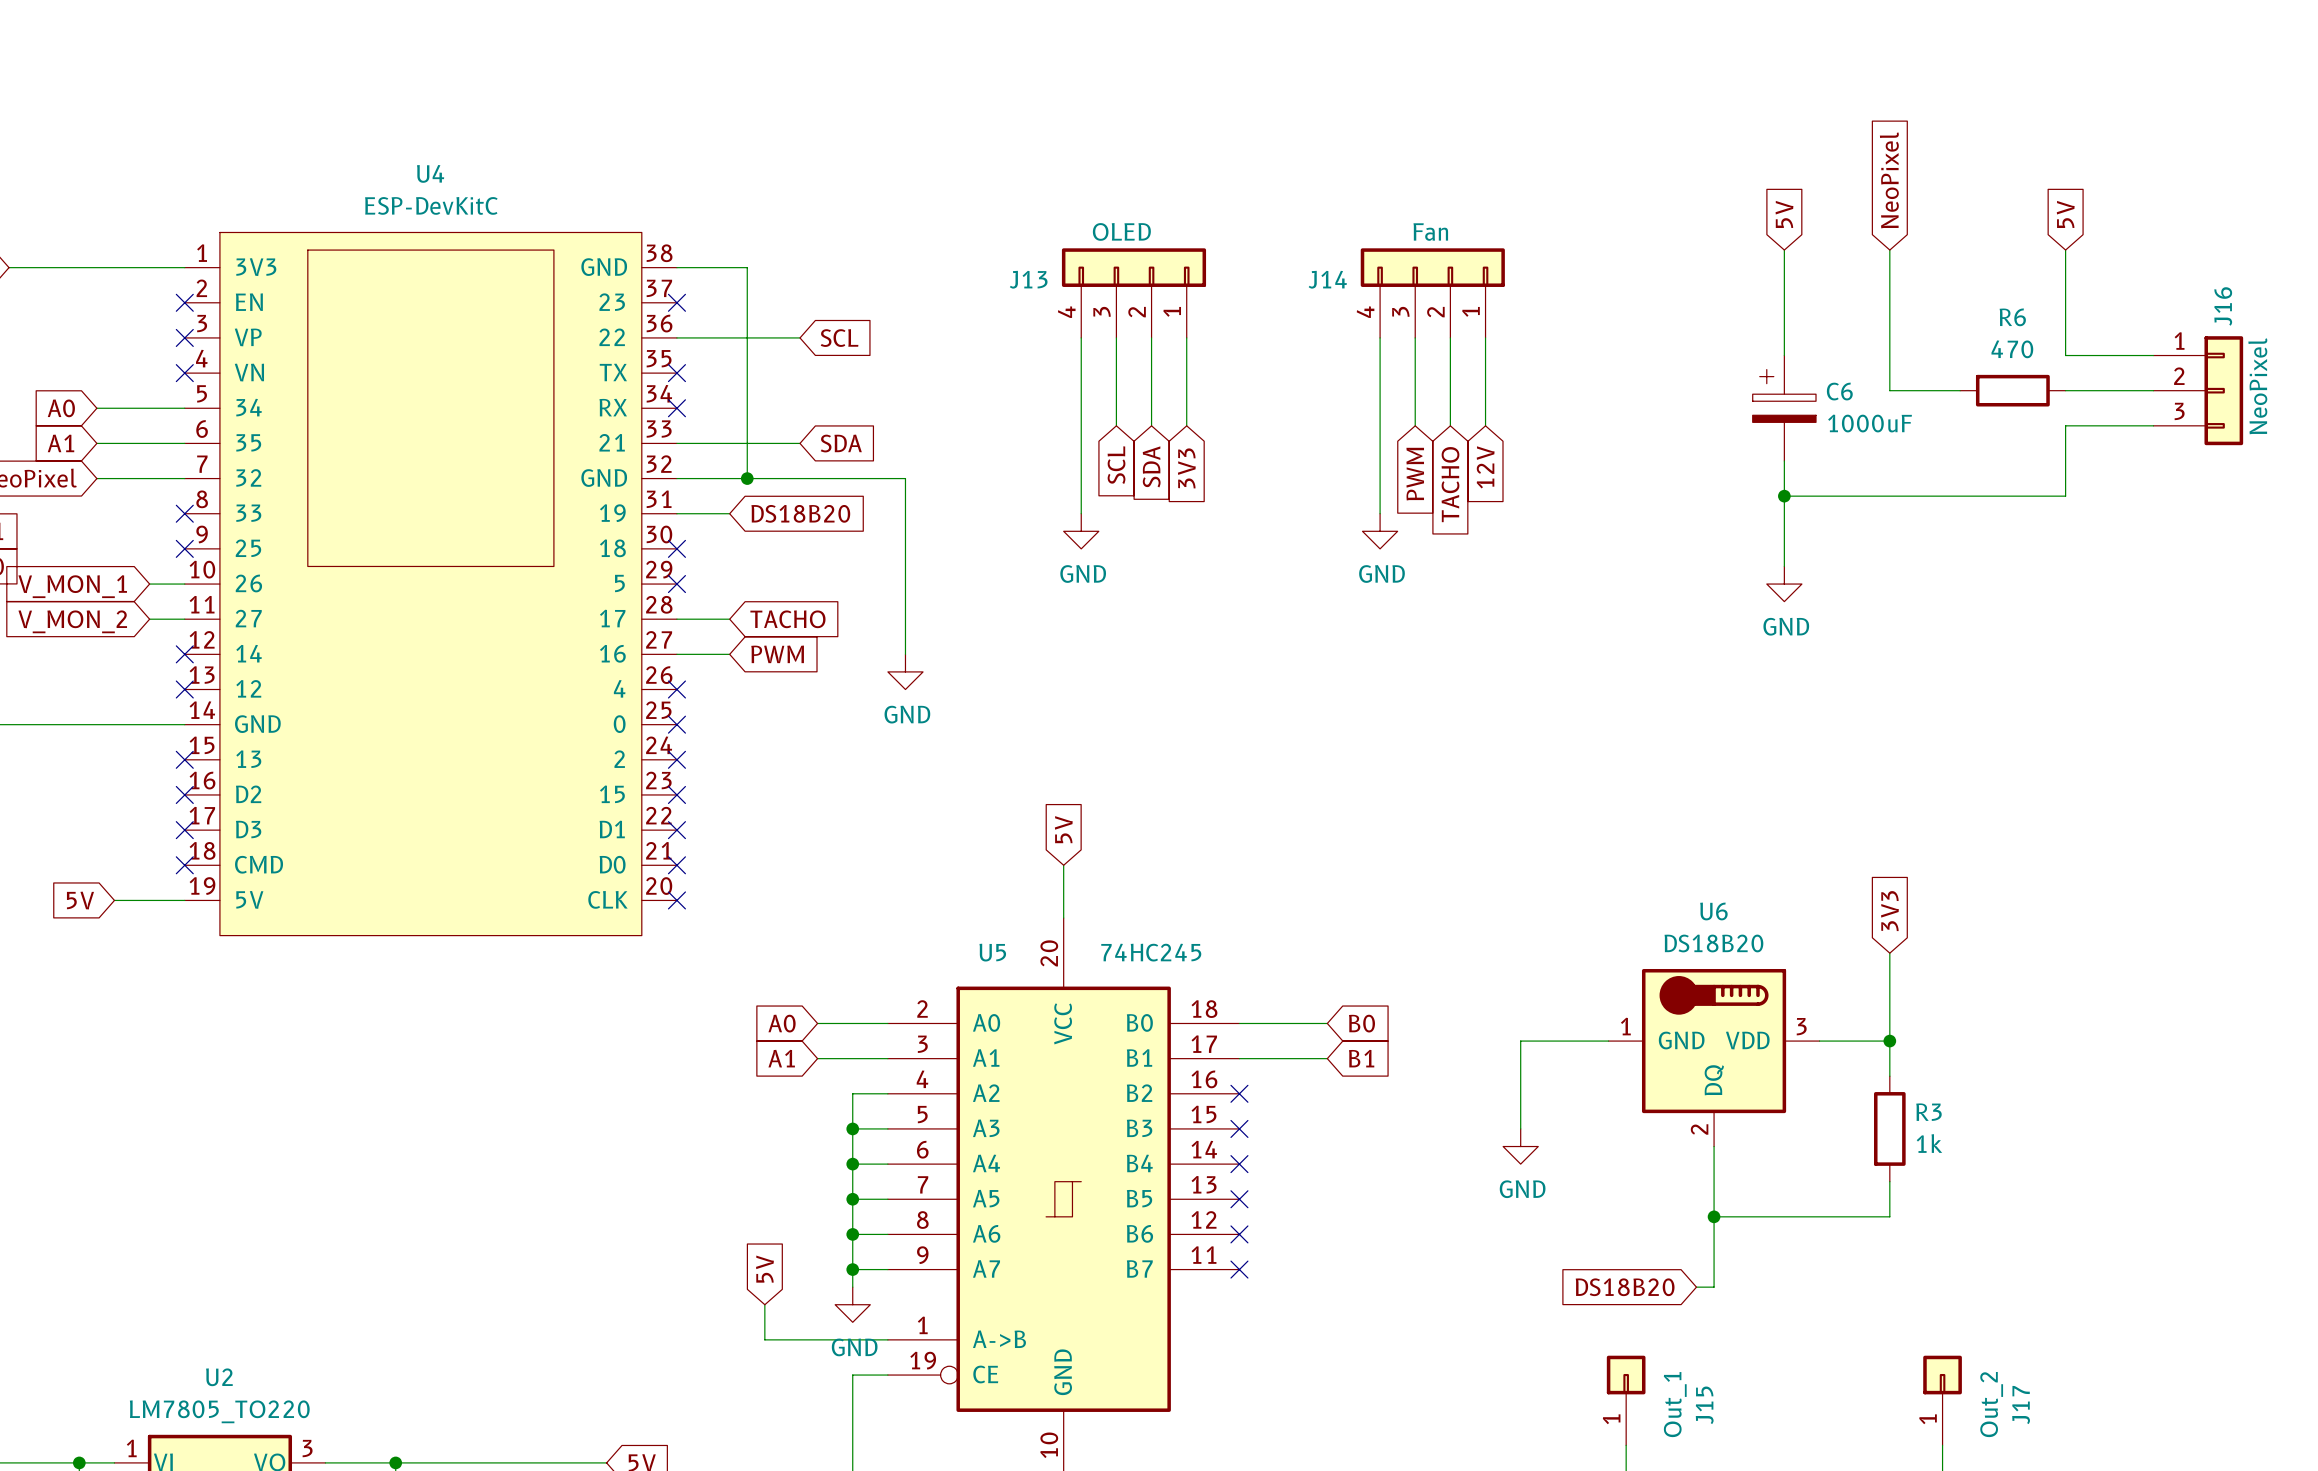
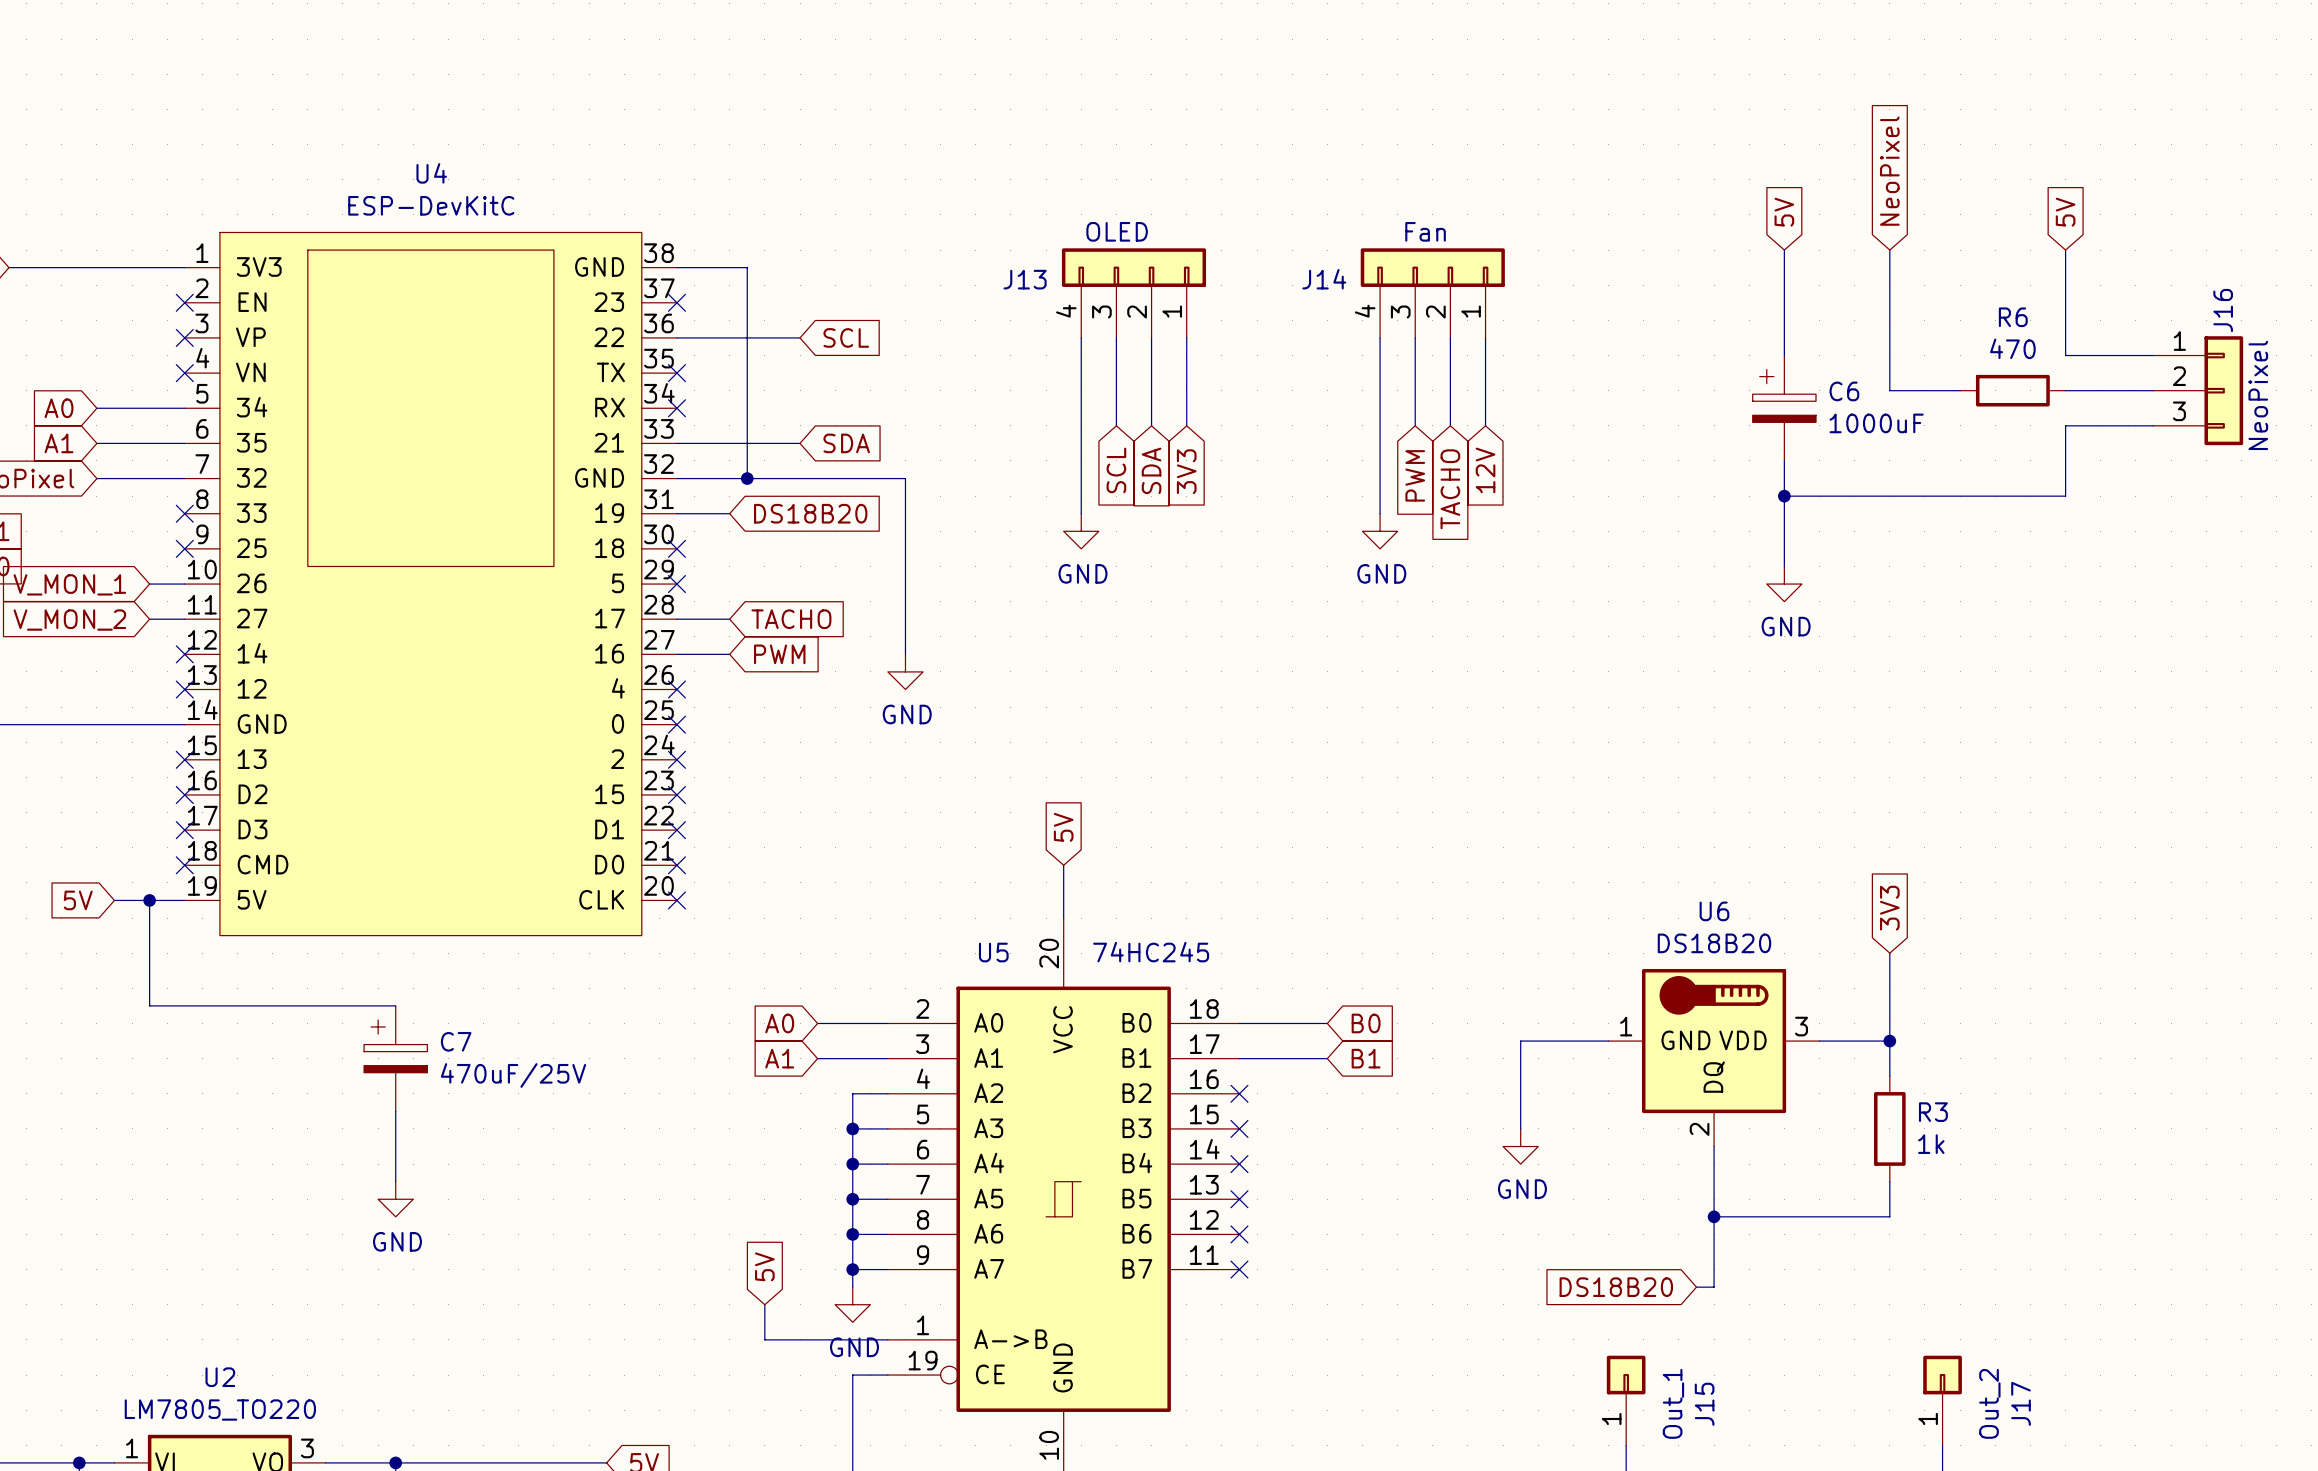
wire: none -> (149, 900) (149, 1005) (395, 1005)
junction: none -> (149, 900)
C7: none -> 470uF/25V (395, 1058)
wire: none -> (395, 1111) (395, 1181)
power symbol: none -> GND (395, 1199)

